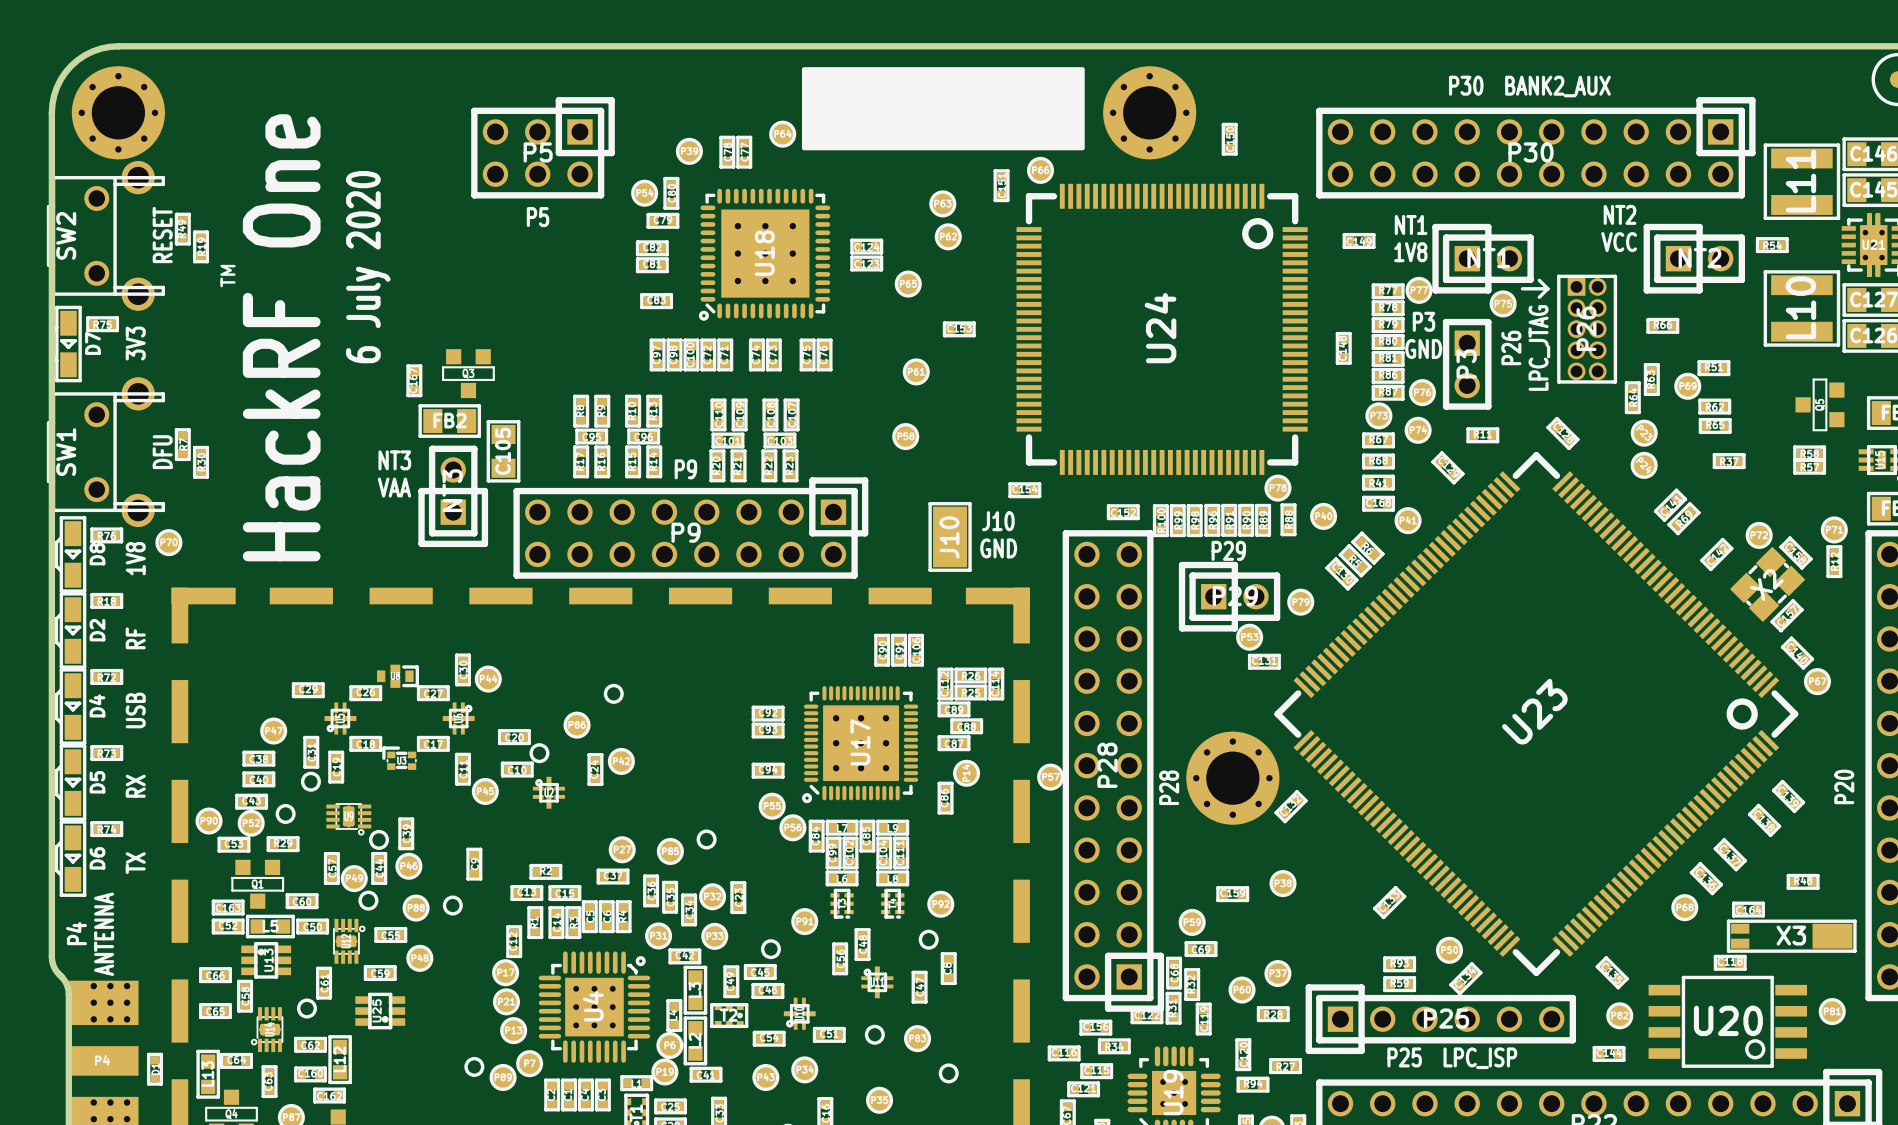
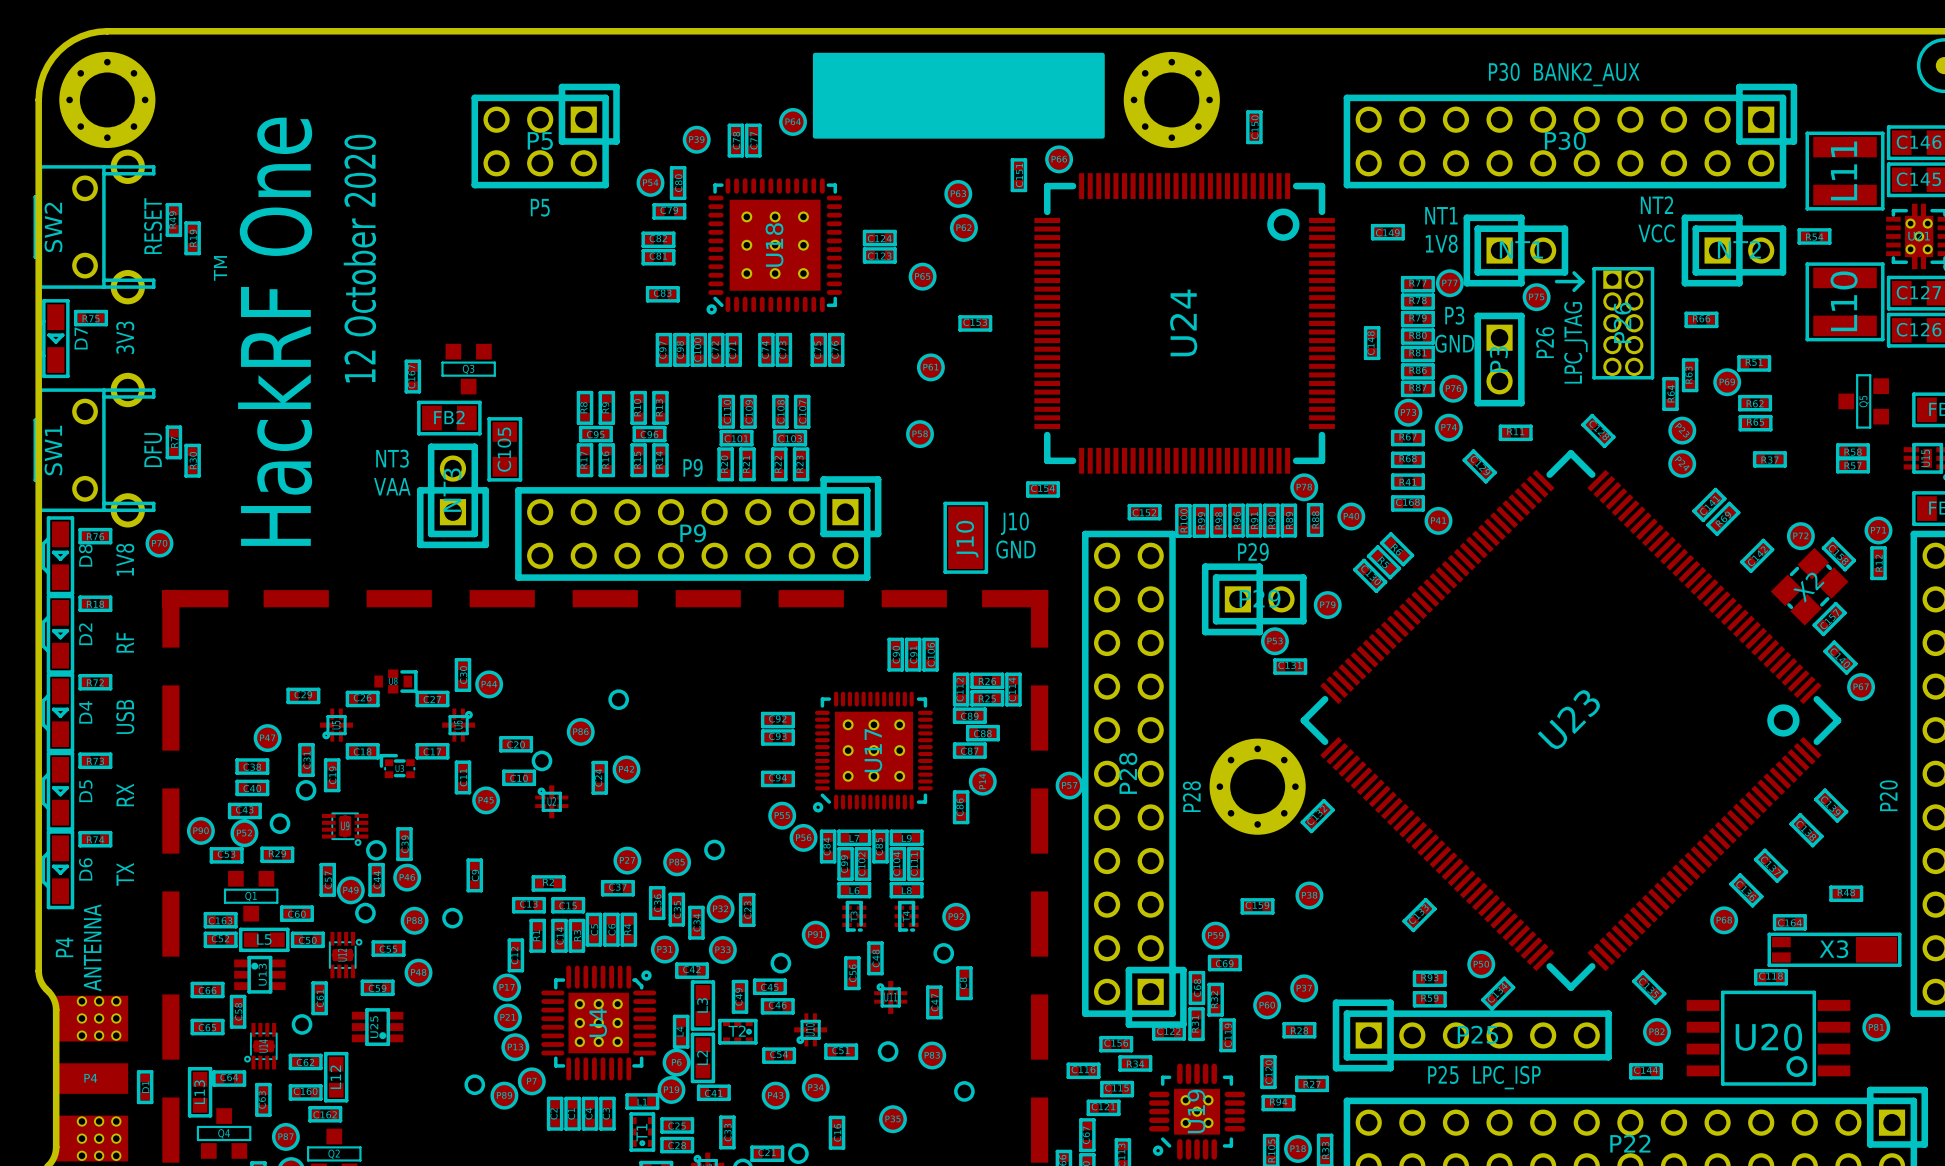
text: 6 July 2020 (368, 267) -> 12 October 2020 (359, 258)

